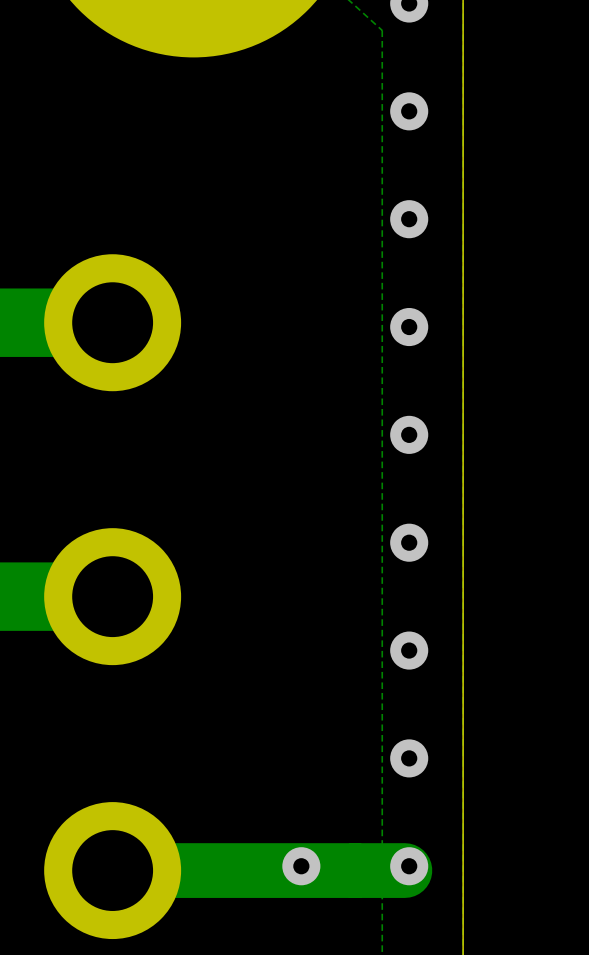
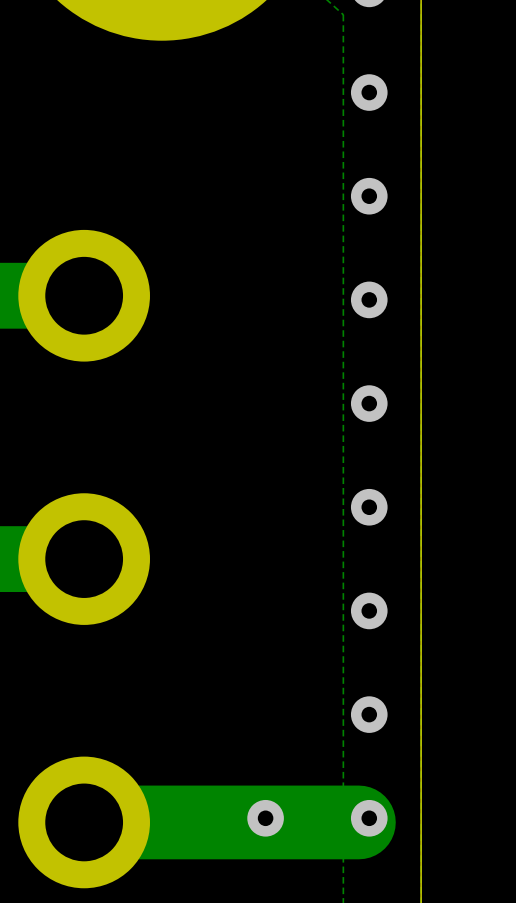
track width: thin (398, 870) (116, 870) -> thick (358, 822) (88, 822)

